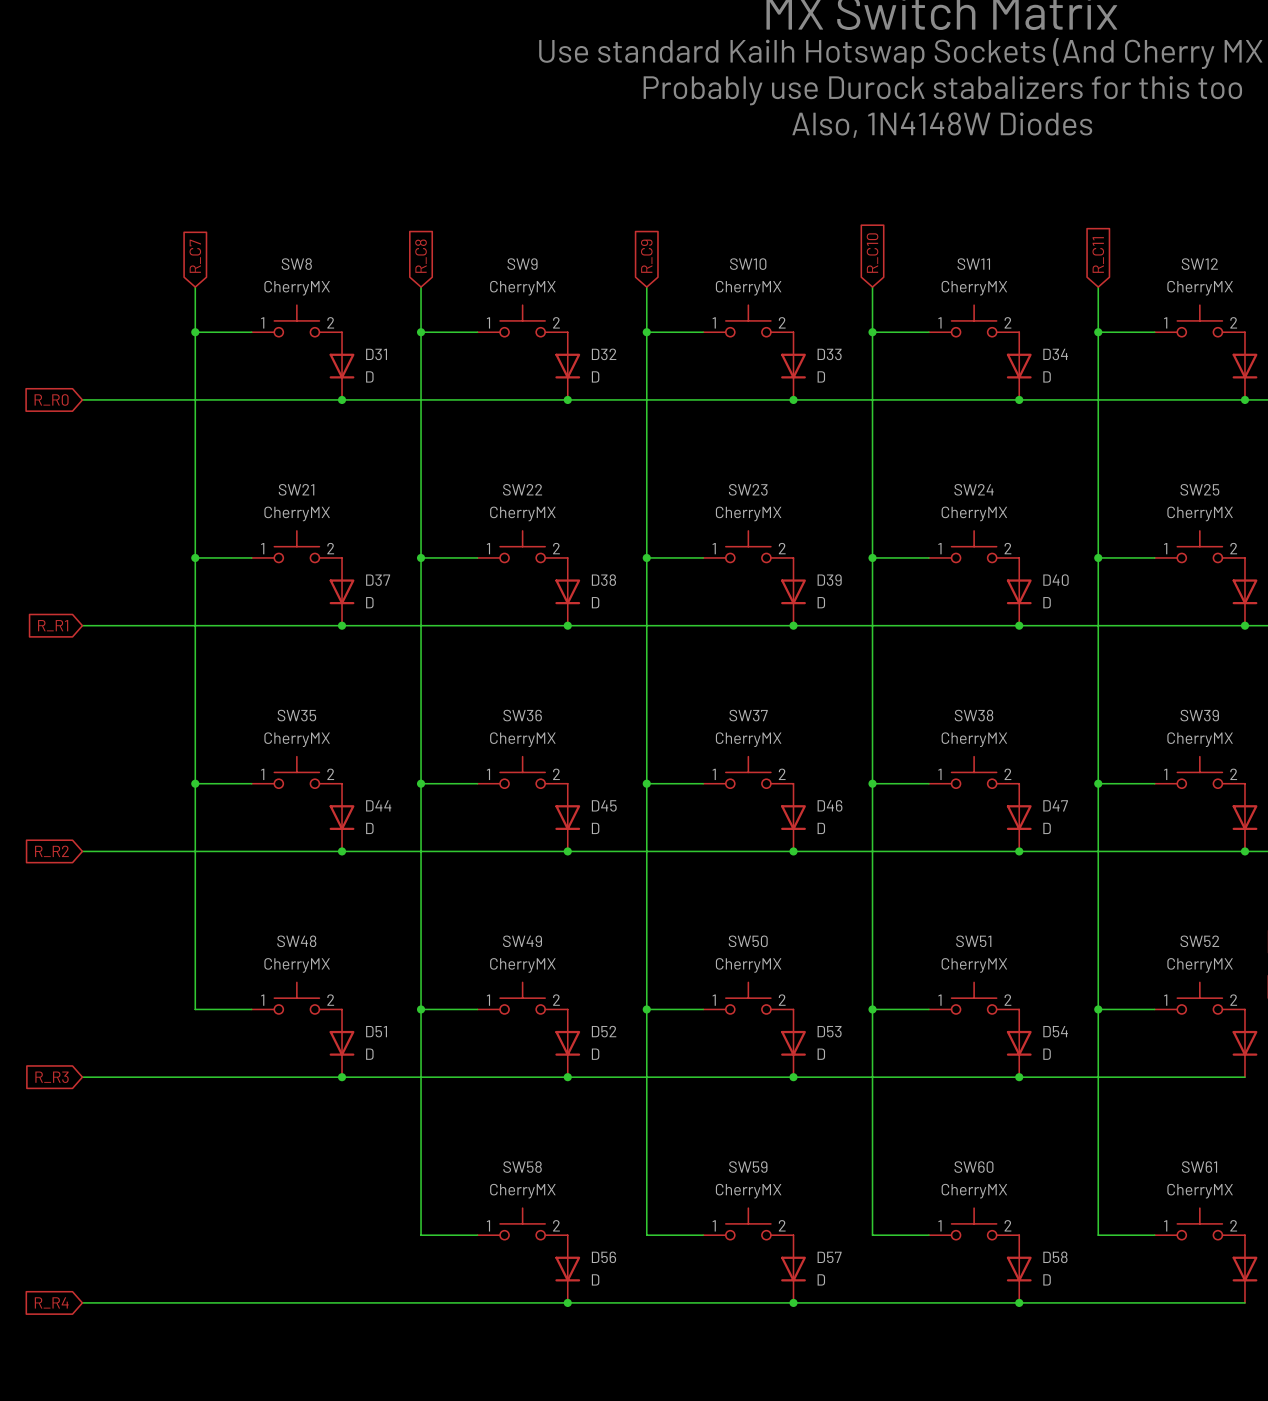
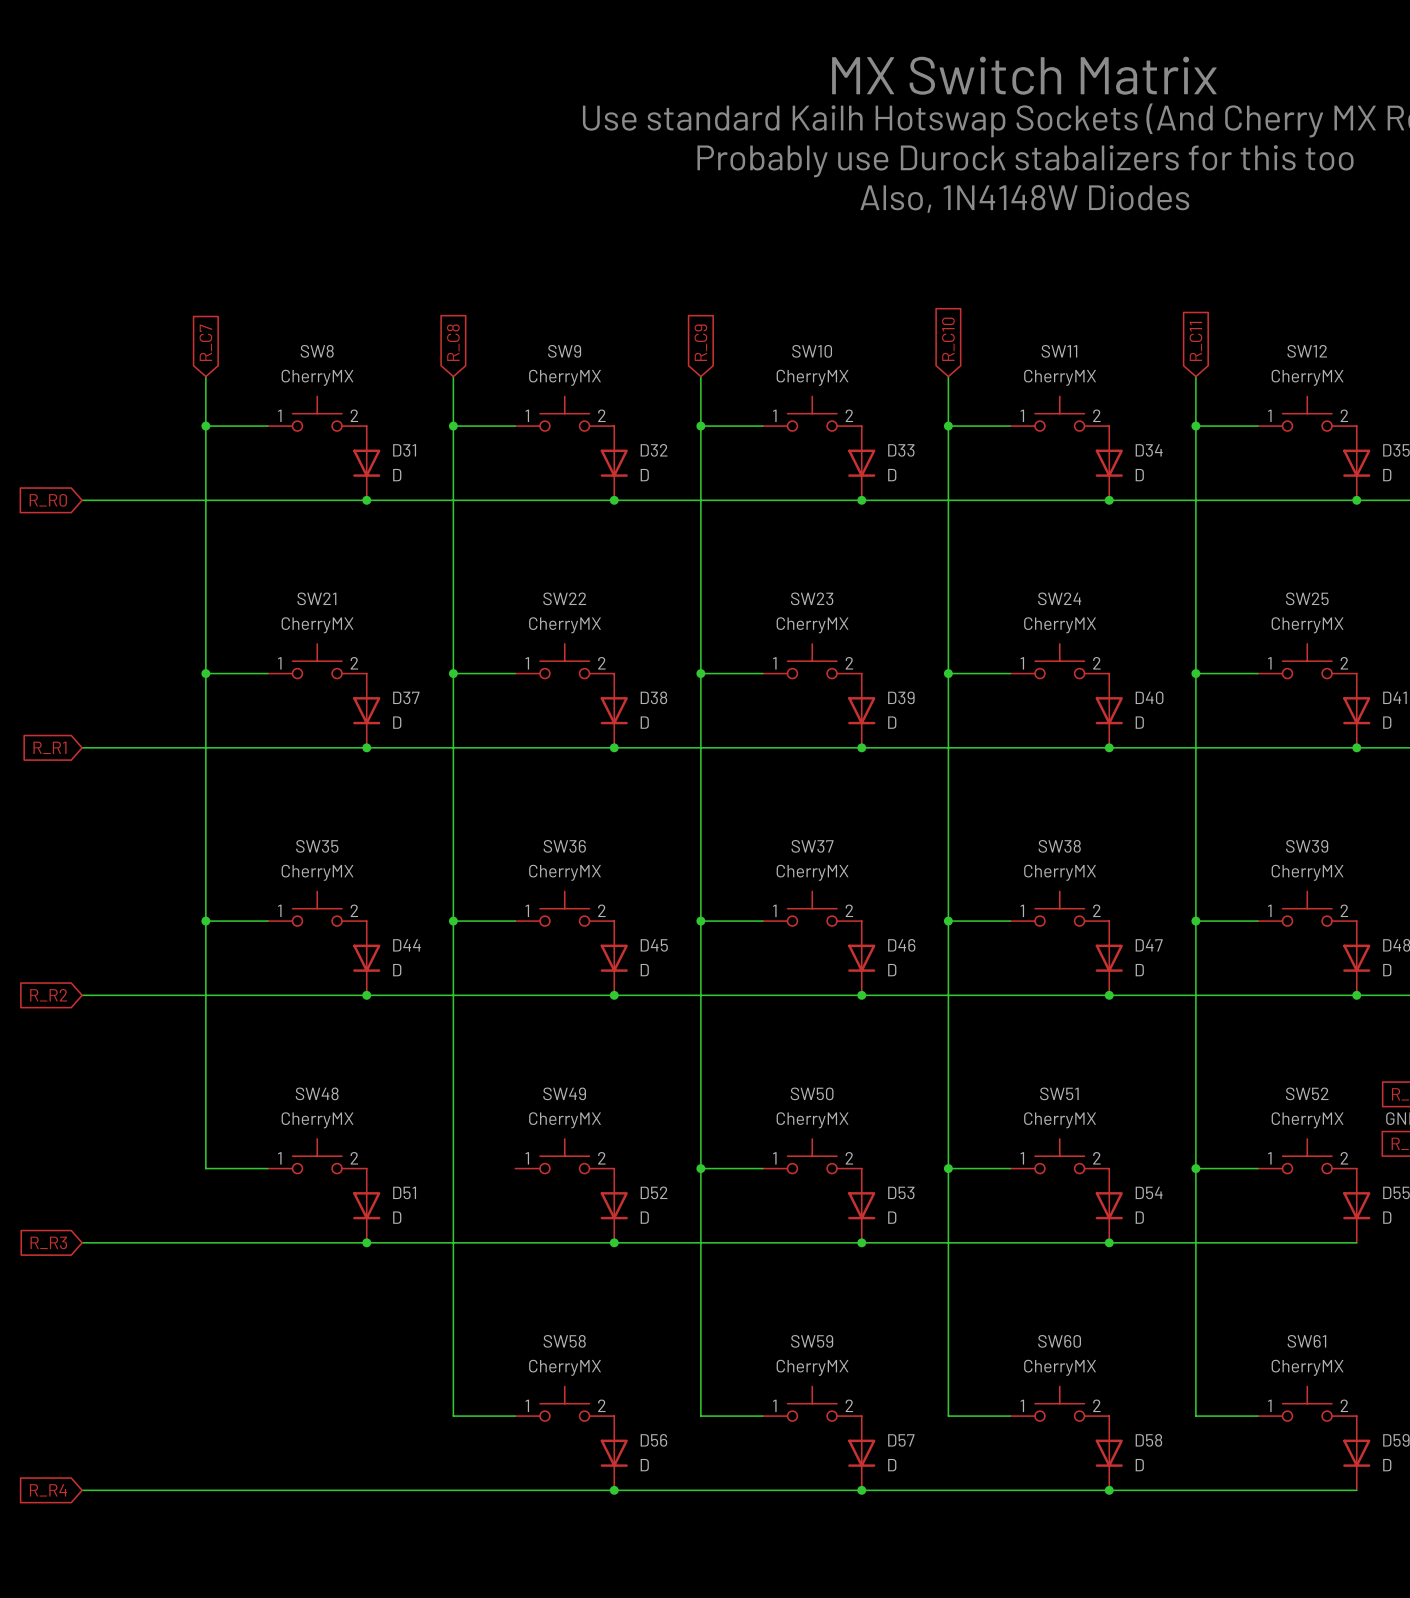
wire: (421, 1009) (477, 1009) -> none
junction: (421, 1009) -> none

